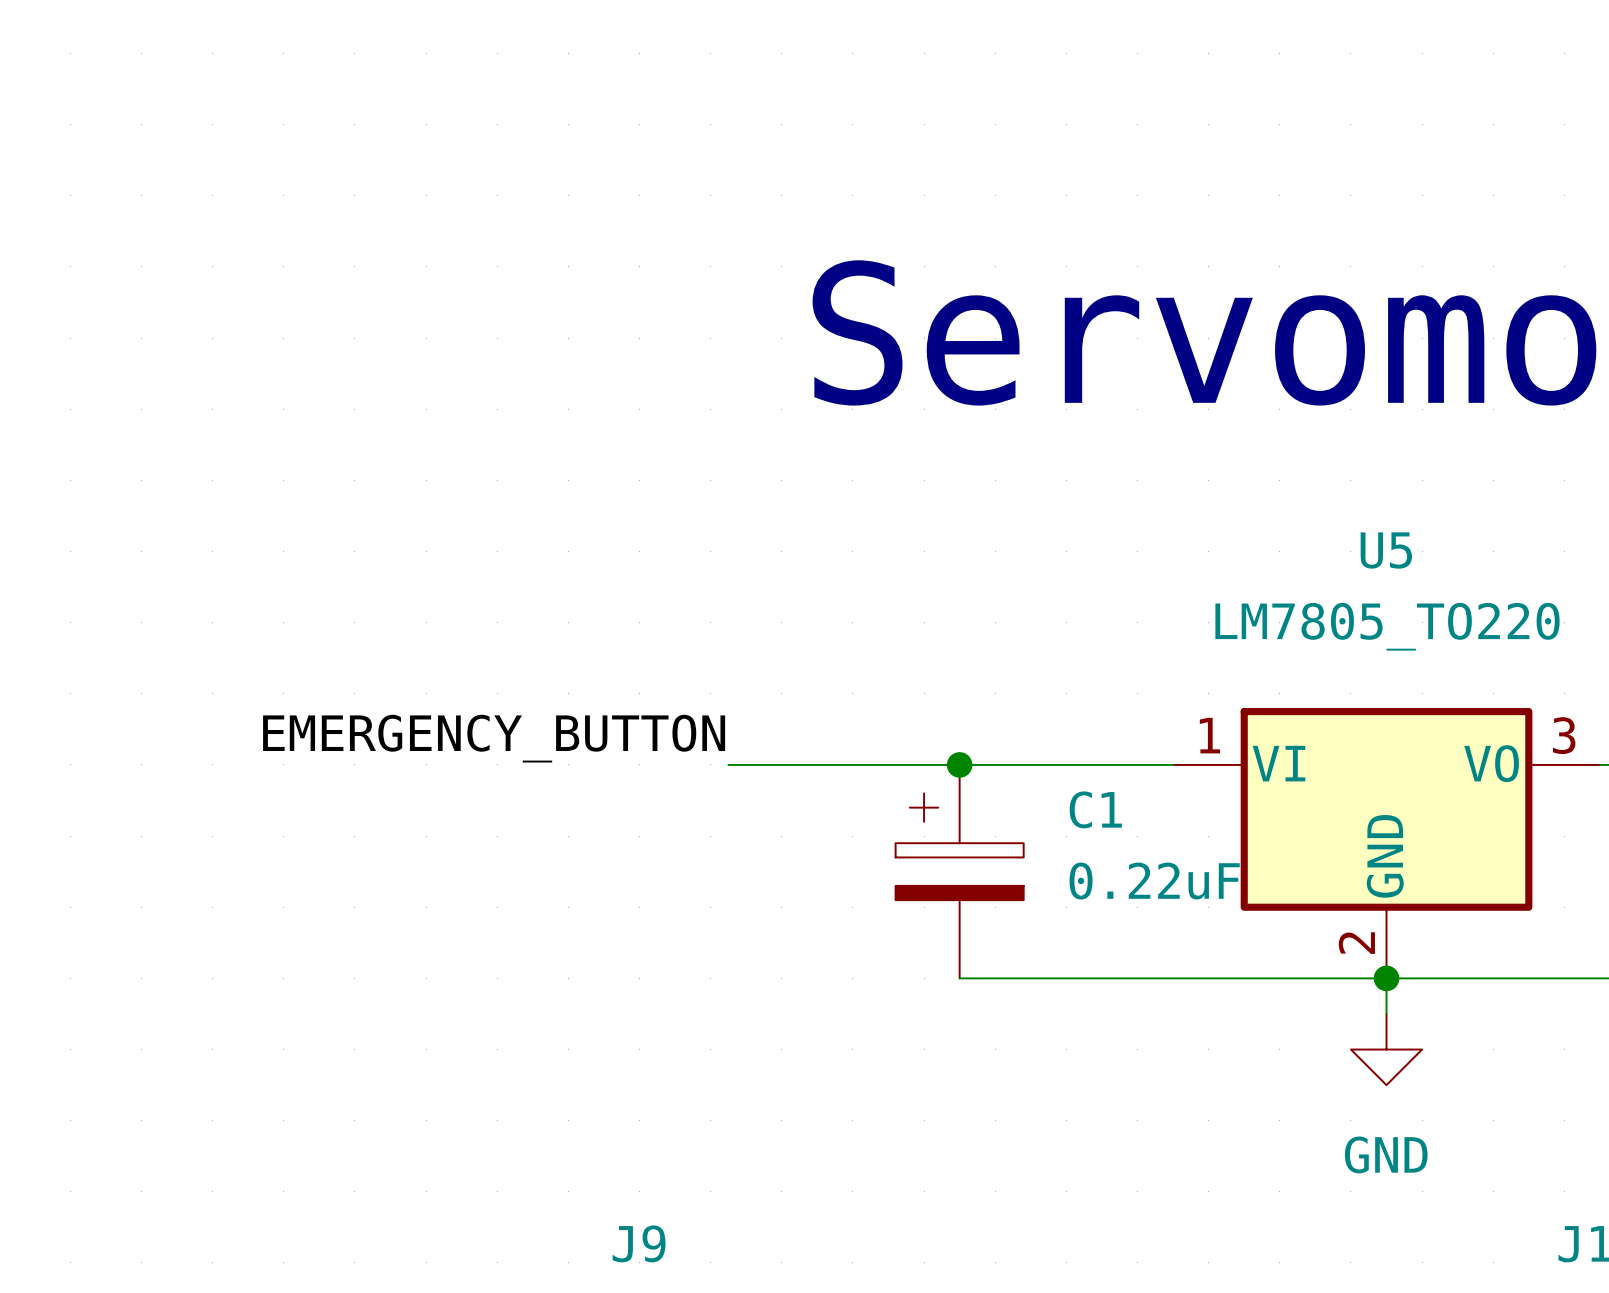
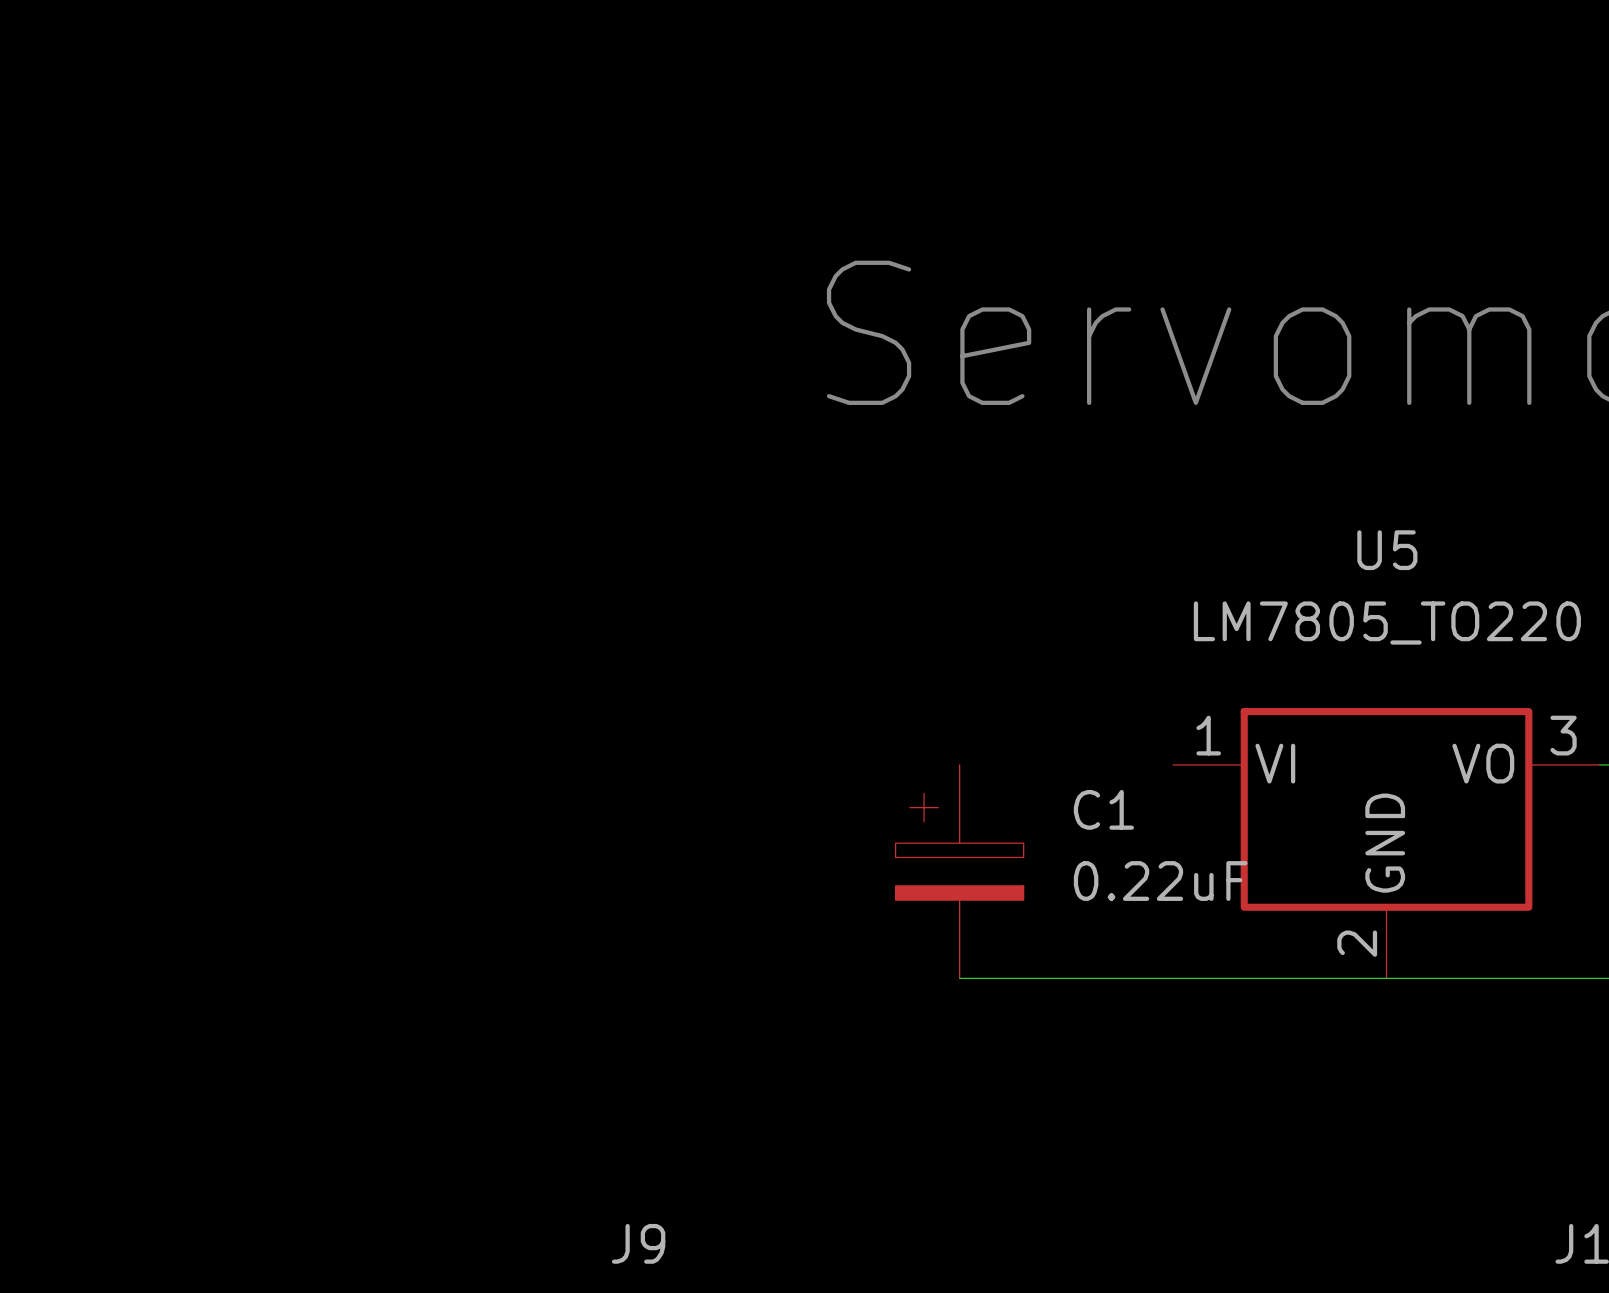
label: EMERGENCY_BUTTON (494, 738) -> none
wire: (728, 764) (1173, 764) -> none
junction: (959, 764) -> none
wire: (1386, 978) (1386, 1013) -> none
junction: (1386, 978) -> none
power symbol: GND (1386, 1049) -> none

